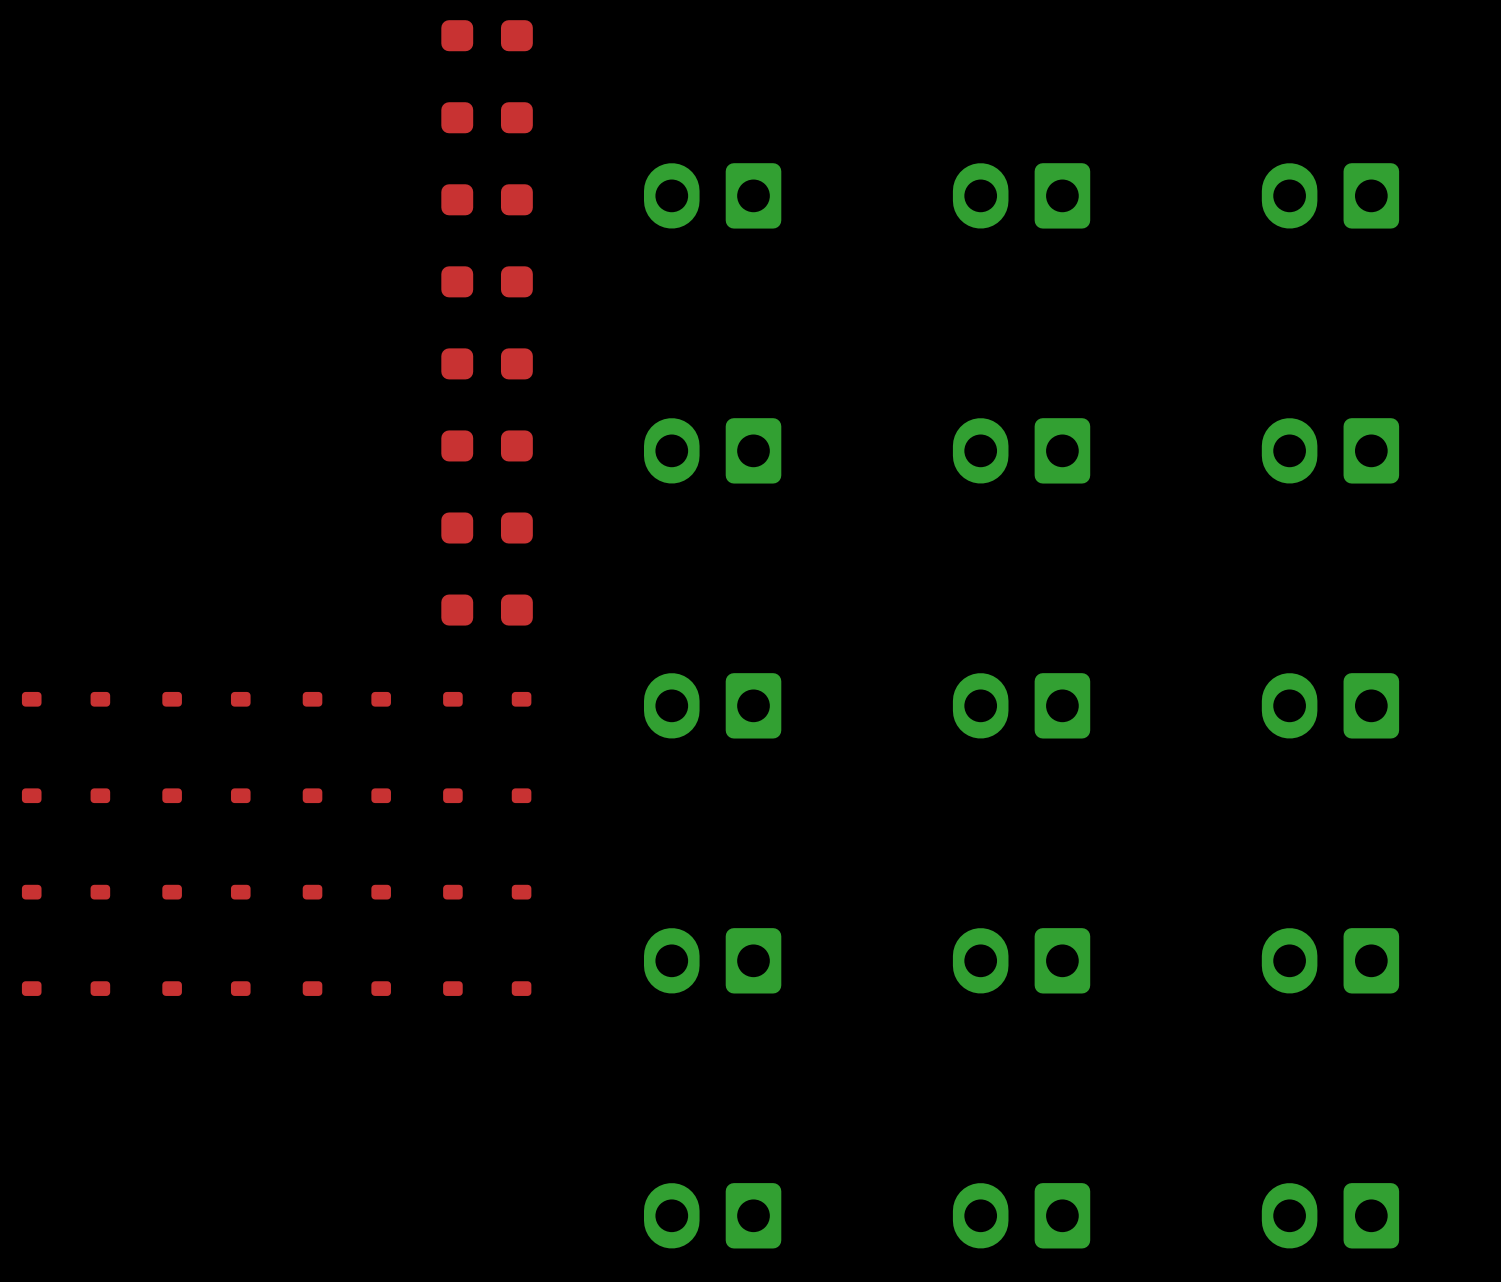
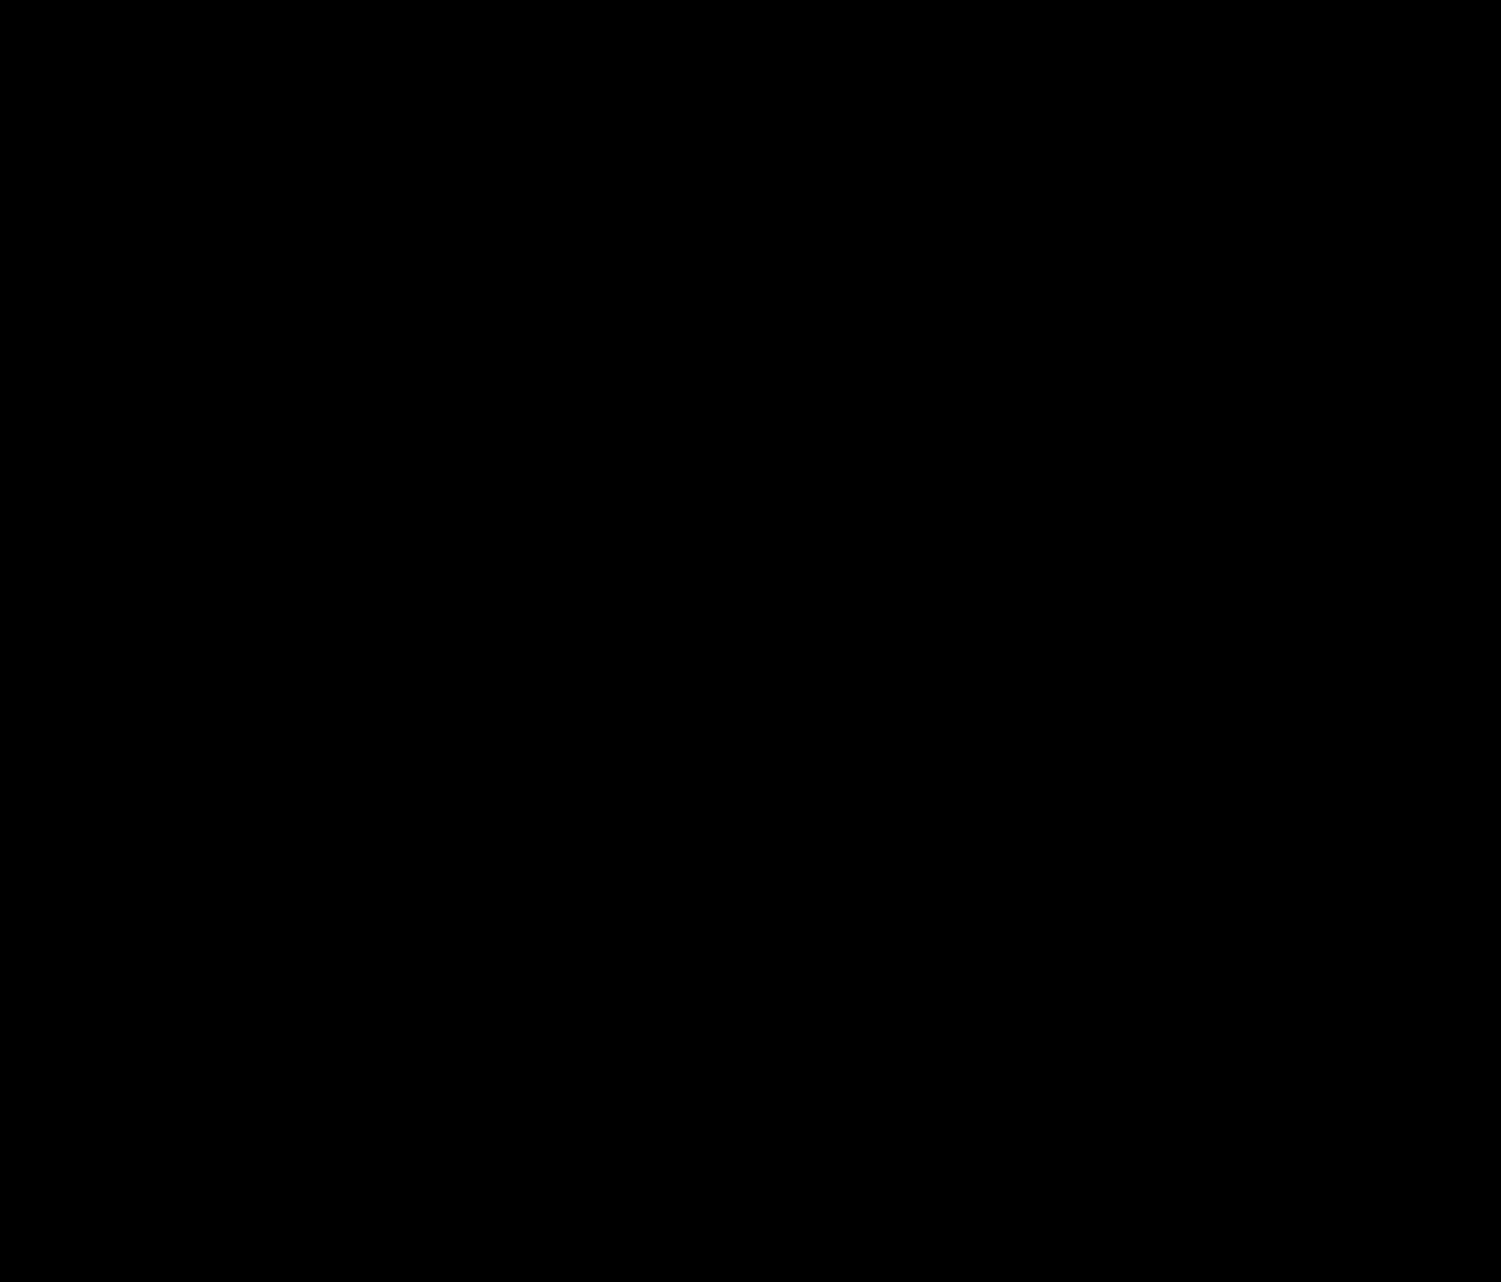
part: (487, 35) -> none
part: (487, 117) -> none
part: (712, 195) -> none
part: (1021, 195) -> none
part: (1330, 195) -> none
part: (487, 199) -> none
part: (487, 281) -> none
part: (487, 363) -> none
part: (487, 445) -> none
part: (712, 450) -> none
part: (1021, 450) -> none
part: (1330, 450) -> none
part: (487, 528) -> none
part: (487, 610) -> none
part: (66, 699) -> none
part: (206, 699) -> none
part: (346, 699) -> none
part: (487, 699) -> none
part: (712, 705) -> none
part: (1021, 705) -> none
part: (1330, 705) -> none
part: (66, 795) -> none
part: (206, 795) -> none
part: (346, 795) -> none
part: (487, 795) -> none
part: (66, 892) -> none
part: (206, 892) -> none
part: (346, 892) -> none
part: (487, 892) -> none
part: (712, 960) -> none
part: (1021, 960) -> none
part: (1330, 960) -> none
part: (66, 988) -> none
part: (206, 988) -> none
part: (346, 988) -> none
part: (487, 988) -> none
part: (712, 1215) -> none
part: (1021, 1215) -> none
part: (1330, 1215) -> none

